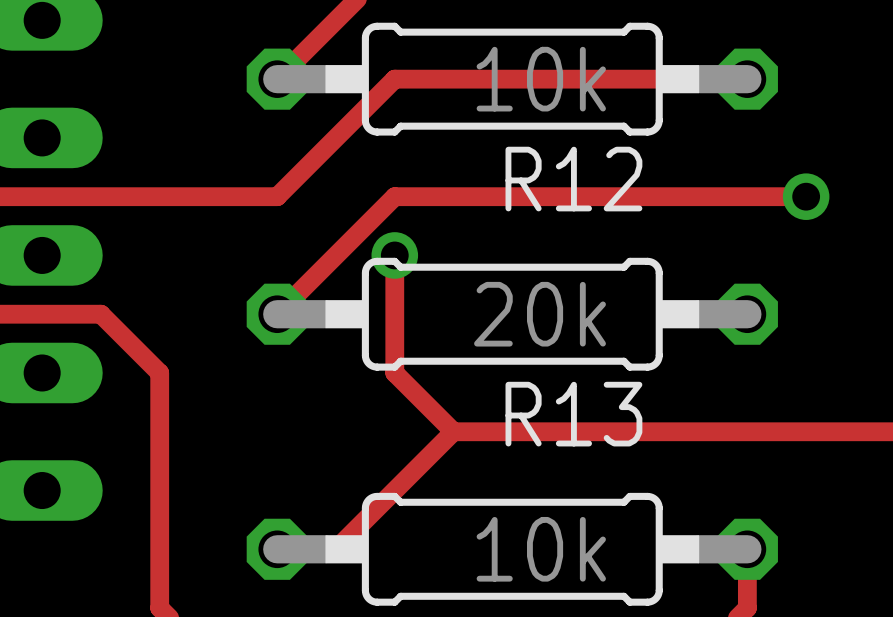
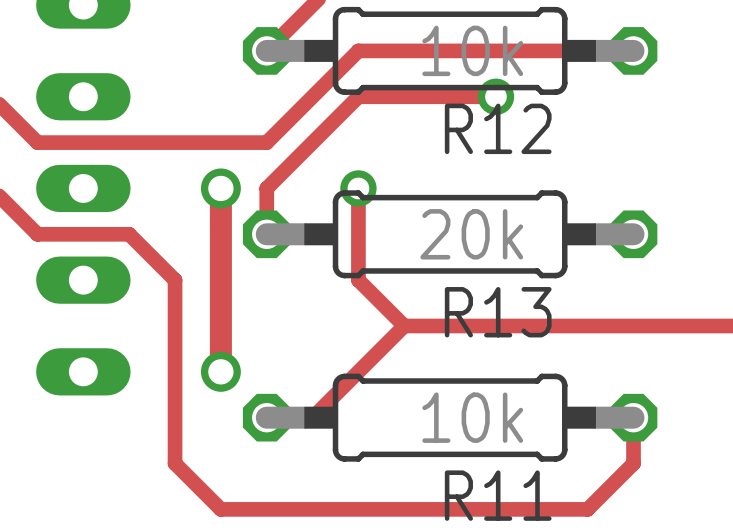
track: (806, 196) (394, 196) (277, 314) -> (495, 96) (358, 96) (266, 188) (266, 234)
via position: (806, 196) -> (495, 96)
track: none -> (220, 188) (220, 371)
via: none -> (220, 188)
via: none -> (220, 371)

